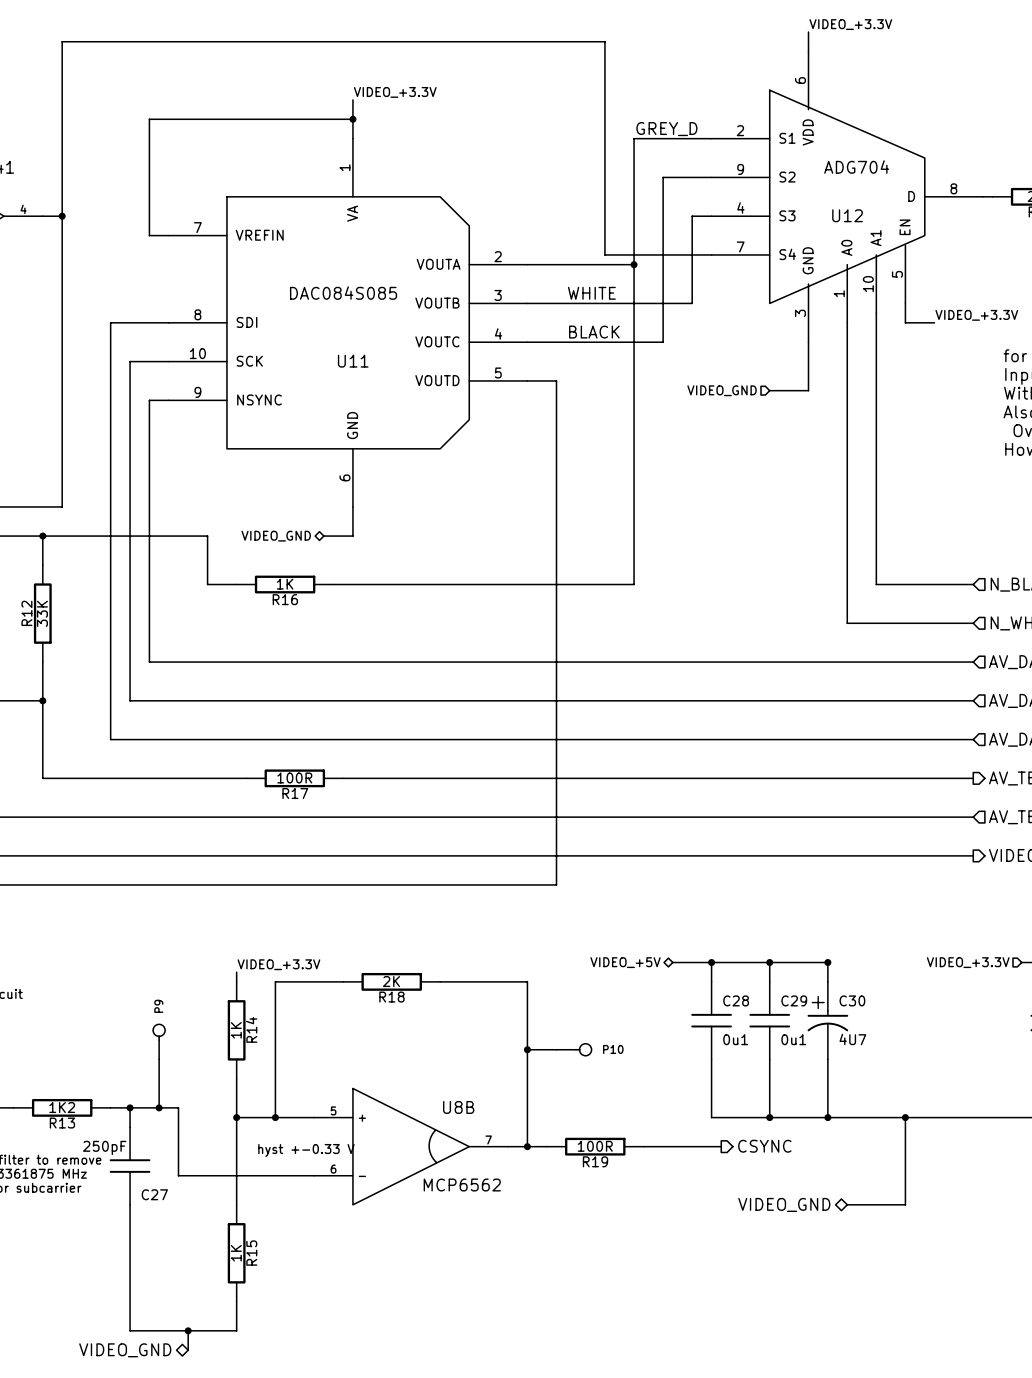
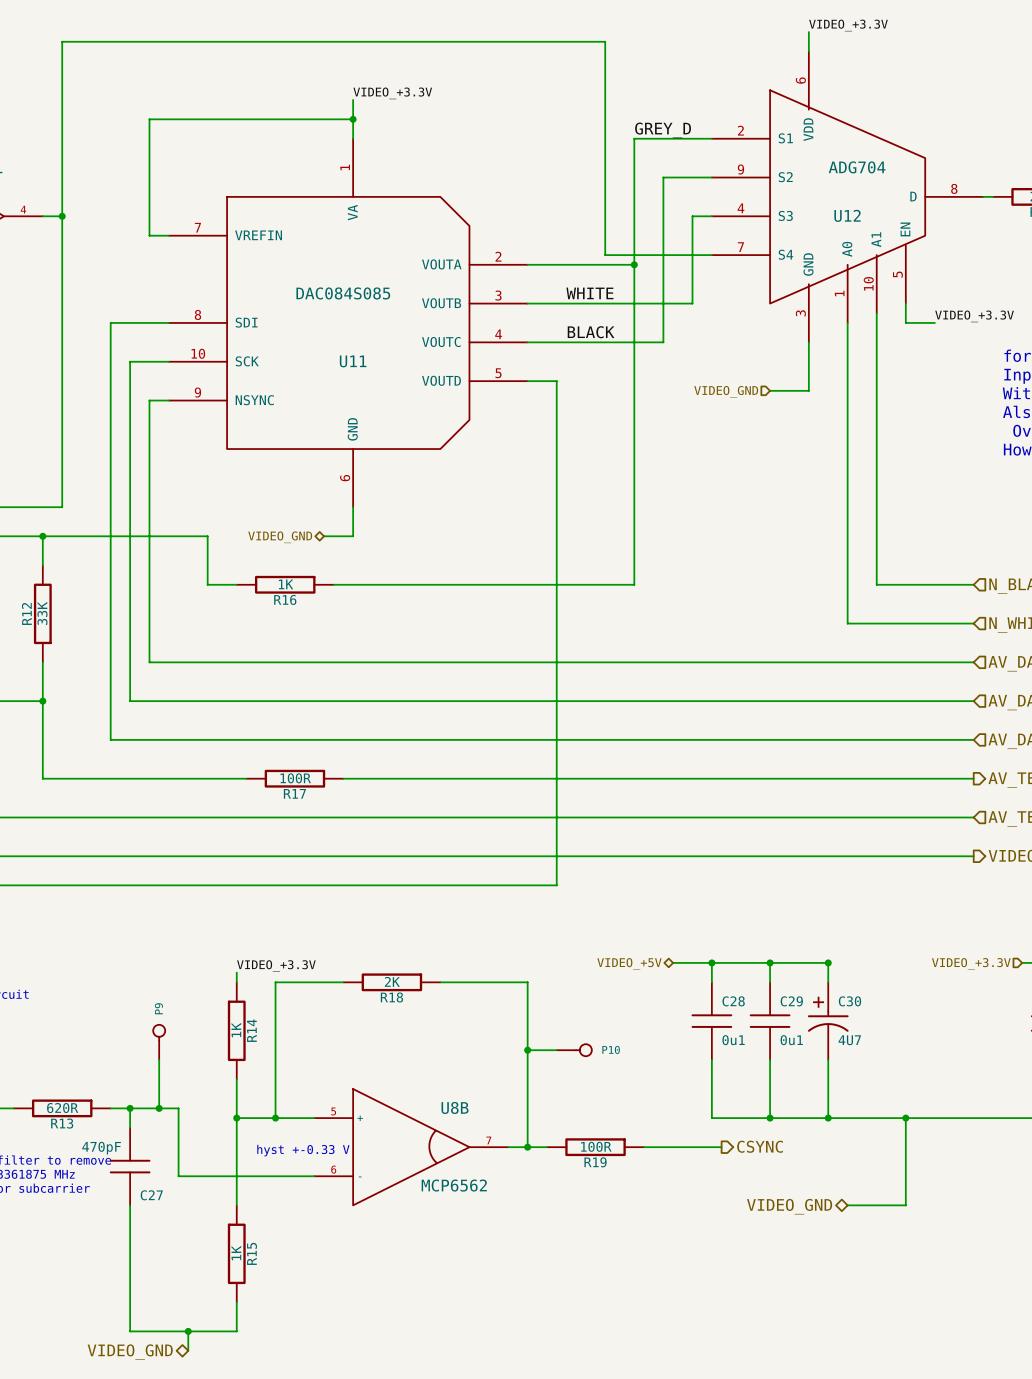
R13 value: 1K2 (62, 1107) -> 620R (62, 1108)
C27 value: 250pF (104, 1147) -> 470pF (101, 1148)

